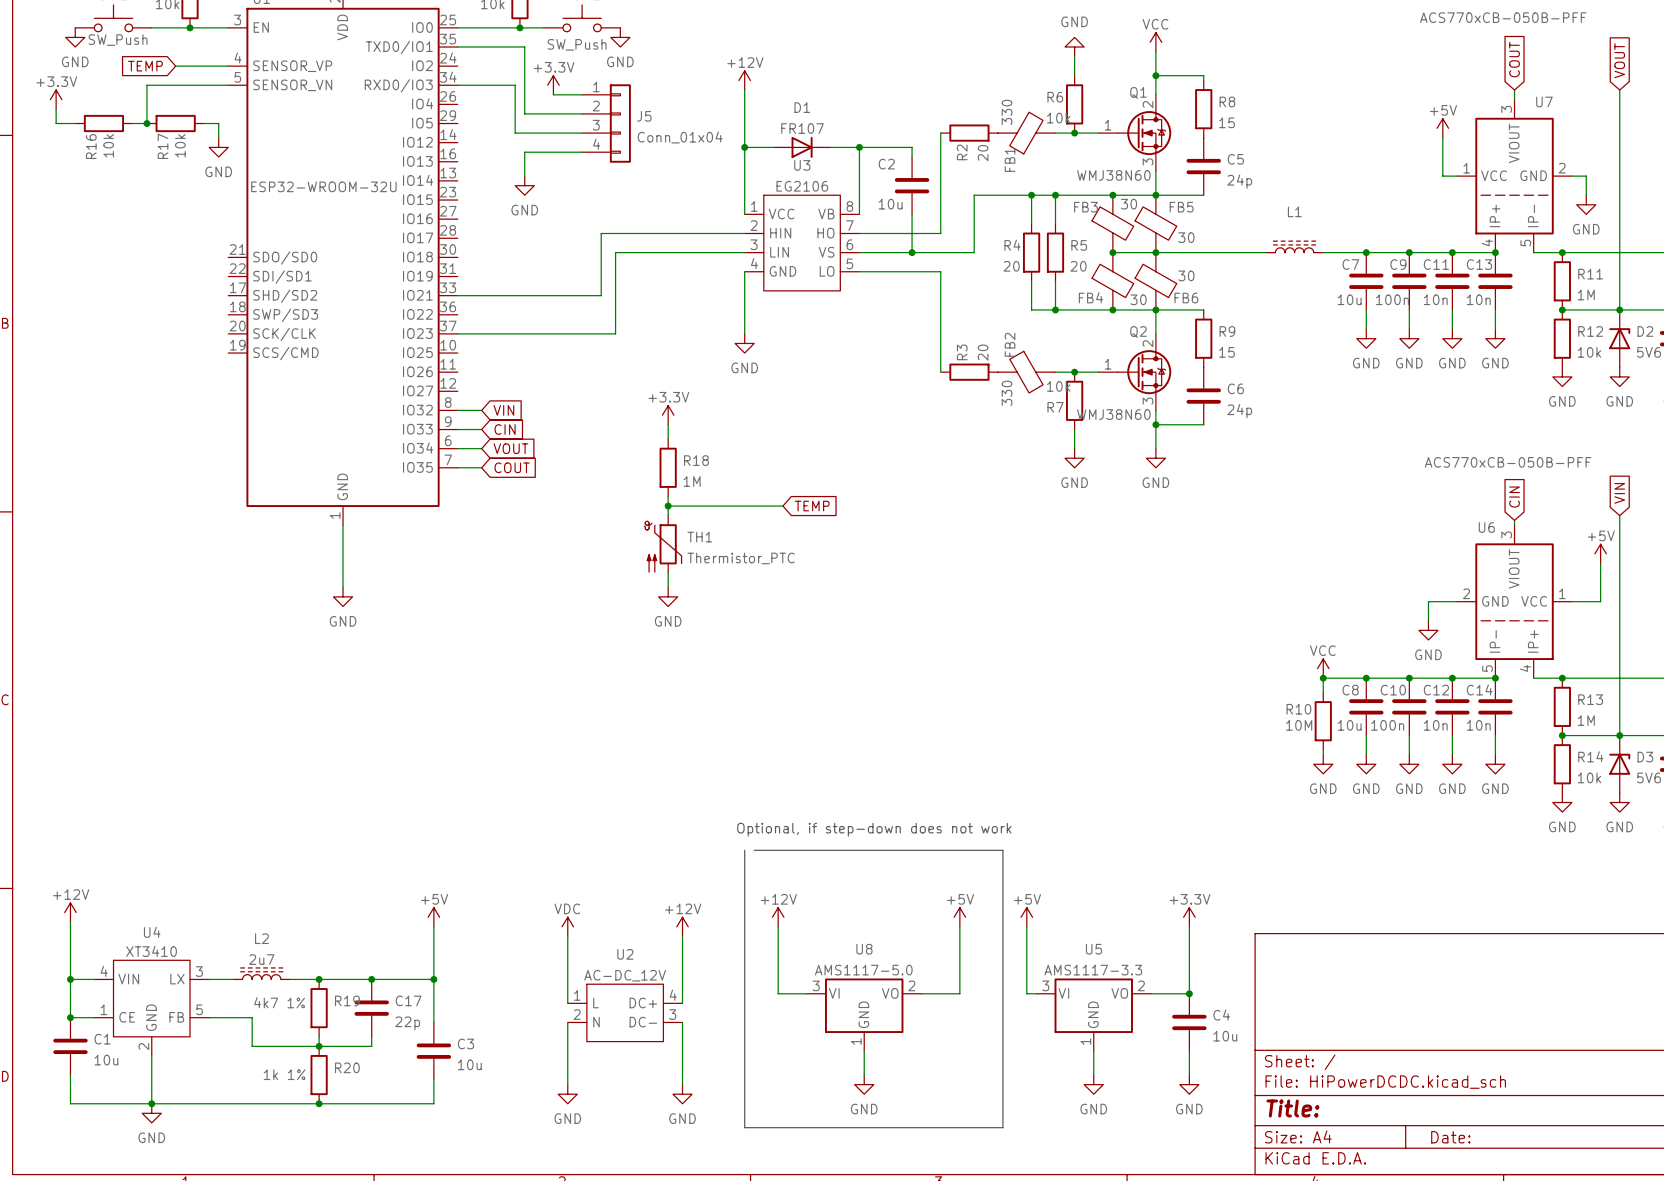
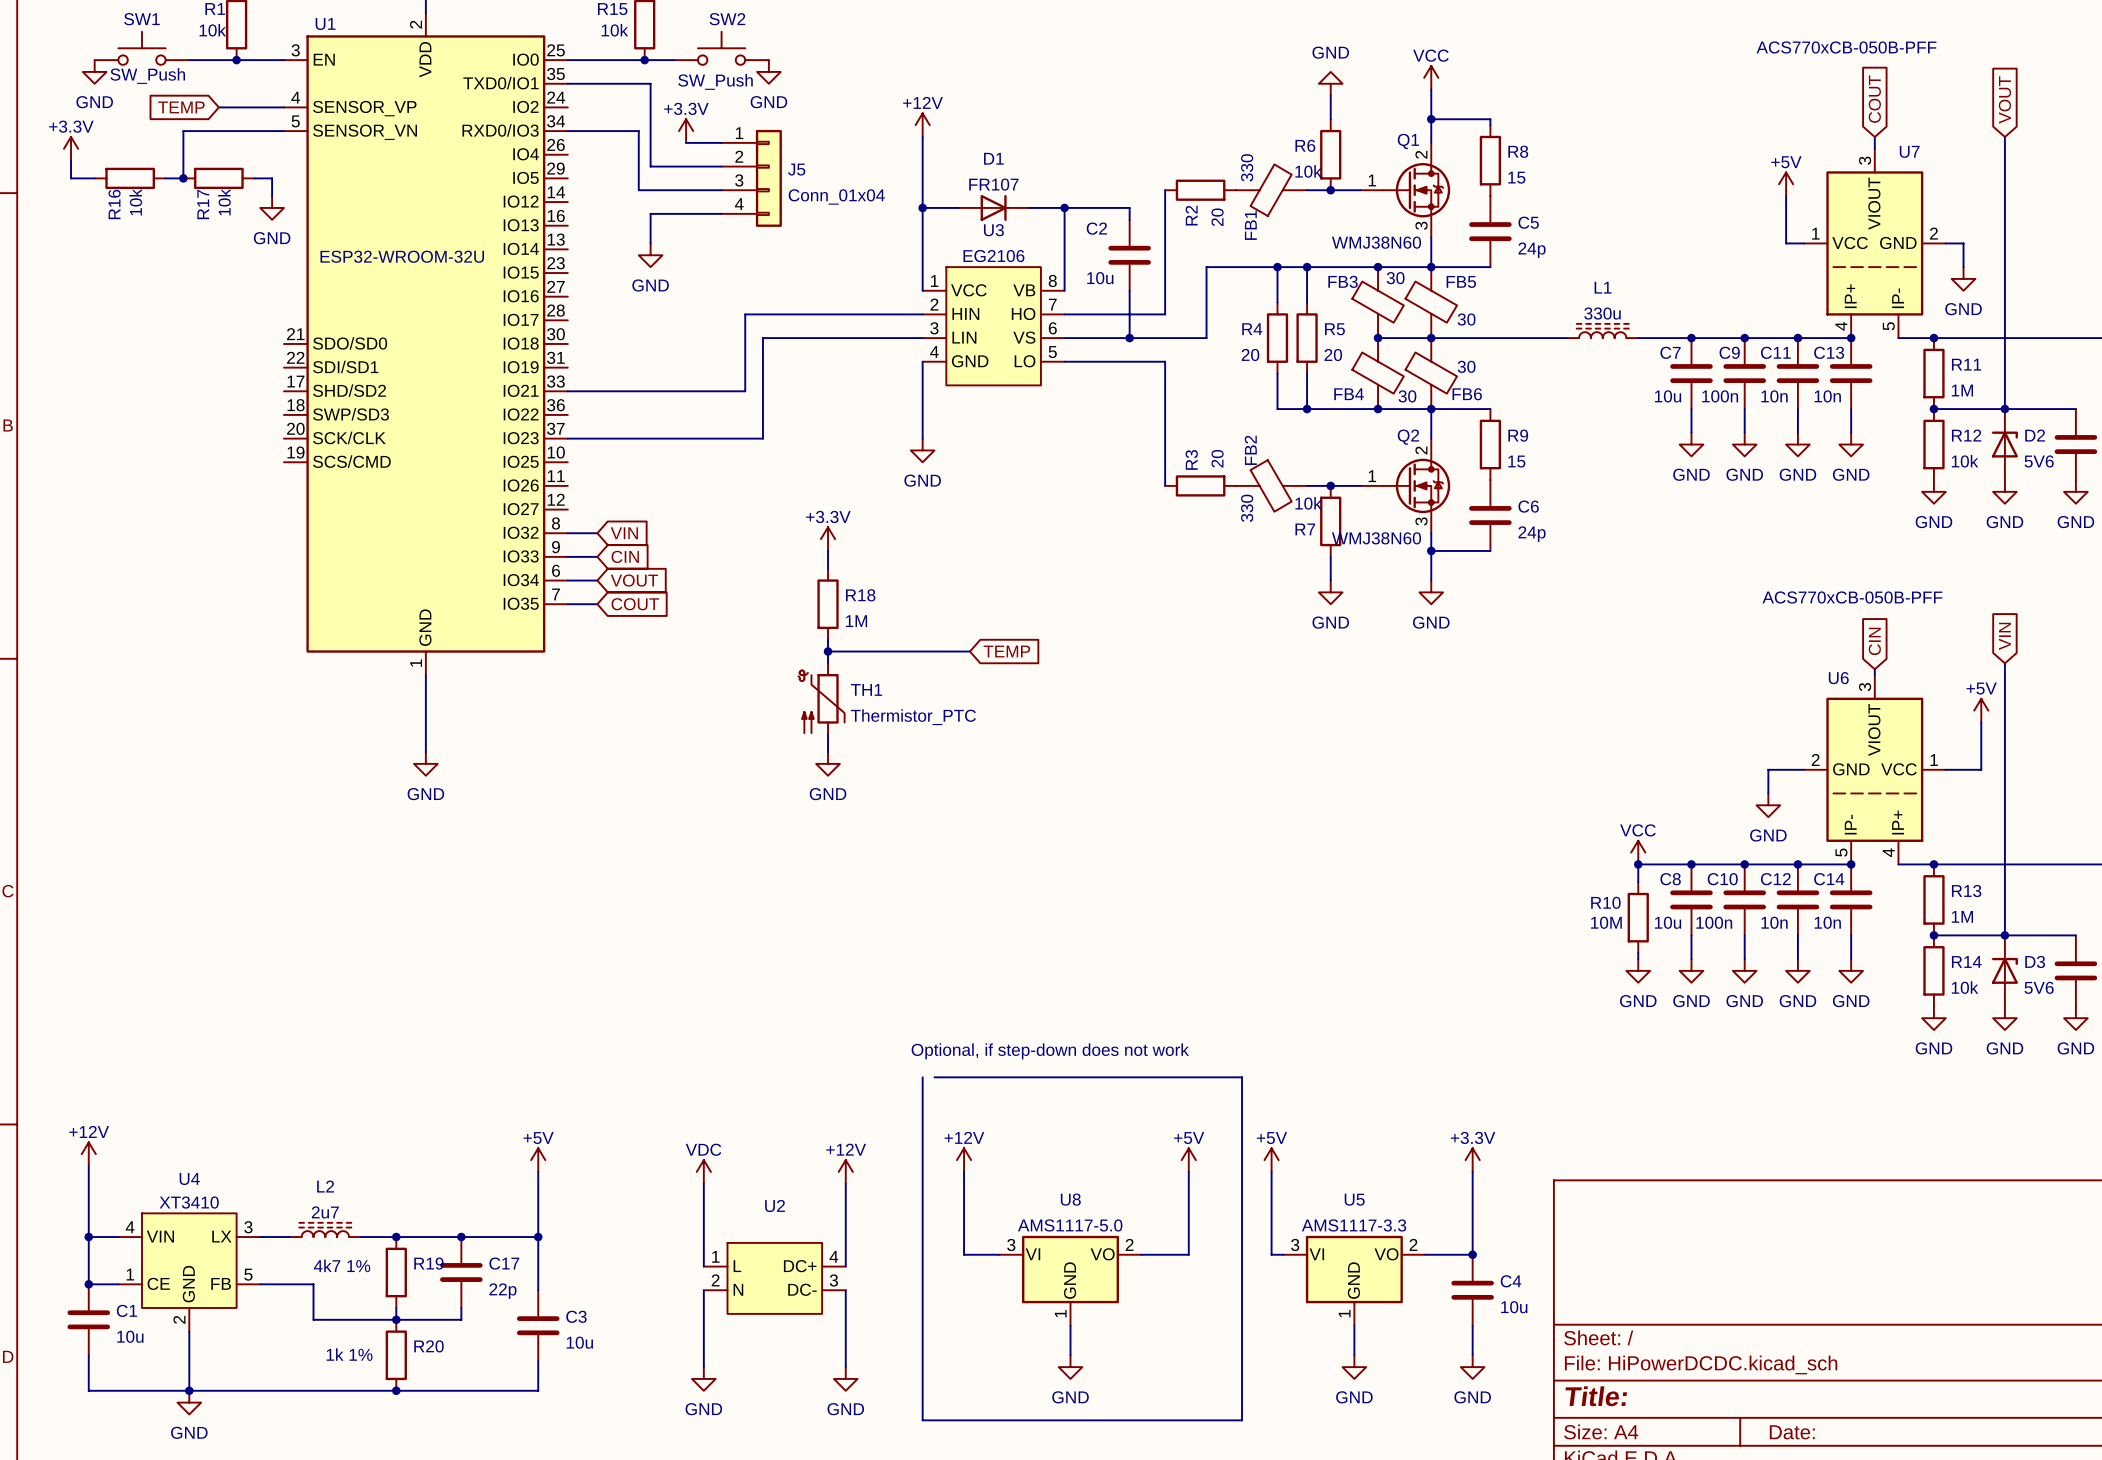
L1 value: none -> 330u (1602, 313)
U2 value: AC-DC_12V (625, 975) -> none

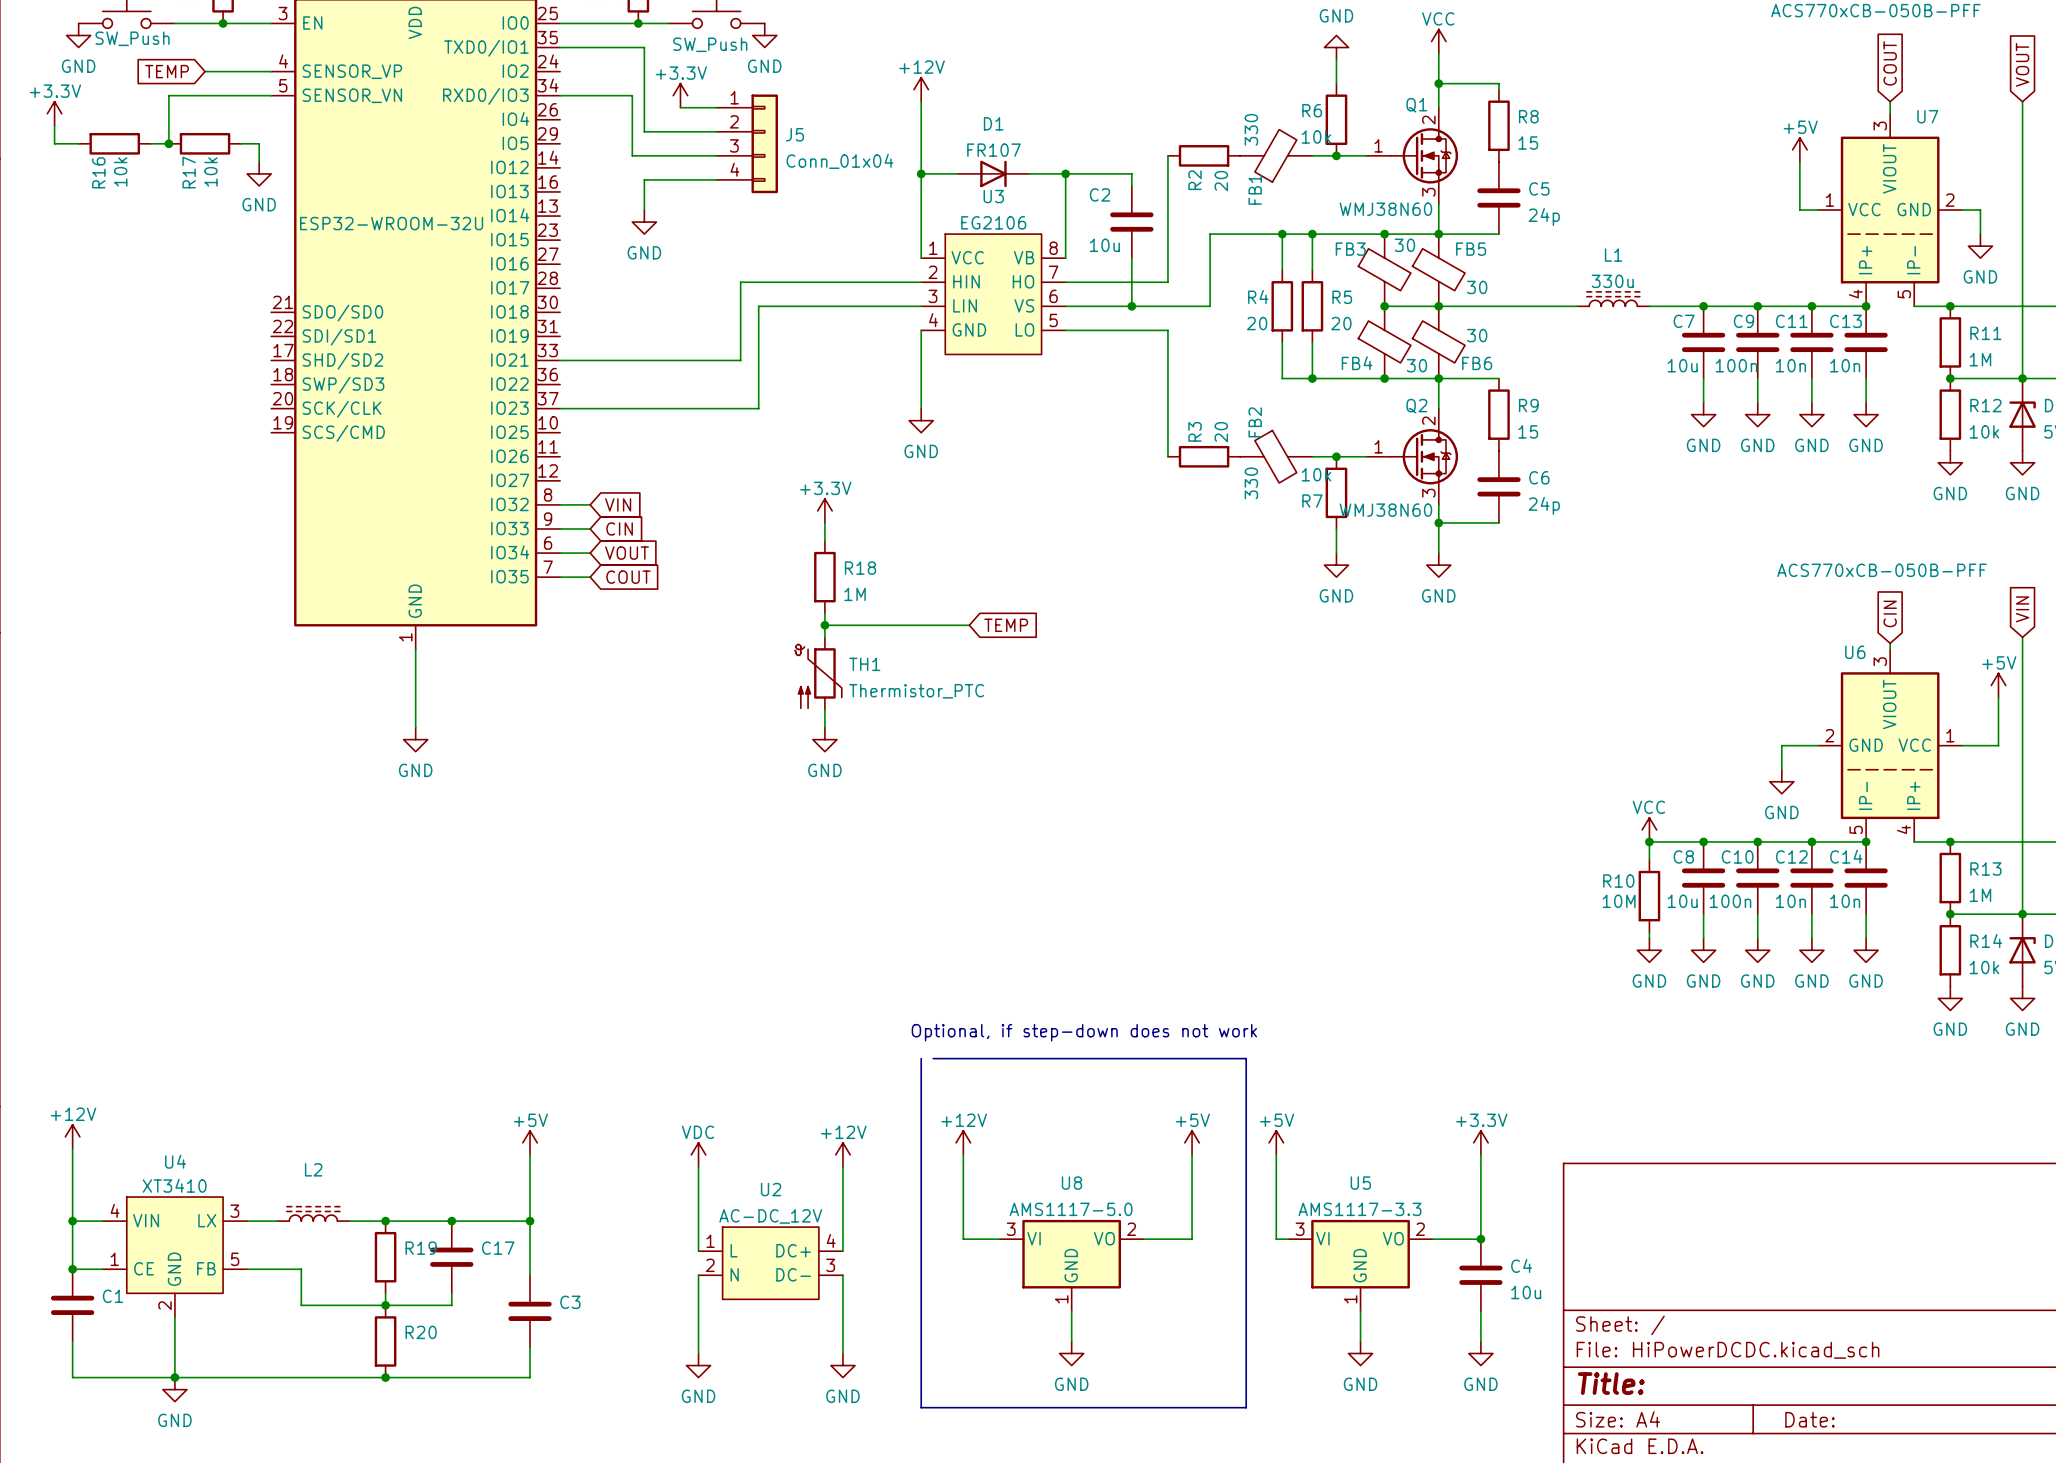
L2 value: 2u7 (325, 1212) -> none
U2 value: none -> AC-DC_12V (770, 1216)
R19 value: 4k7 1% (342, 1265) -> none
C17 value: 22p (502, 1291) -> none
C1 value: 10u (130, 1336) -> none
C3 value: 10u (579, 1342) -> none
R20 value: 1k 1% (349, 1354) -> none

